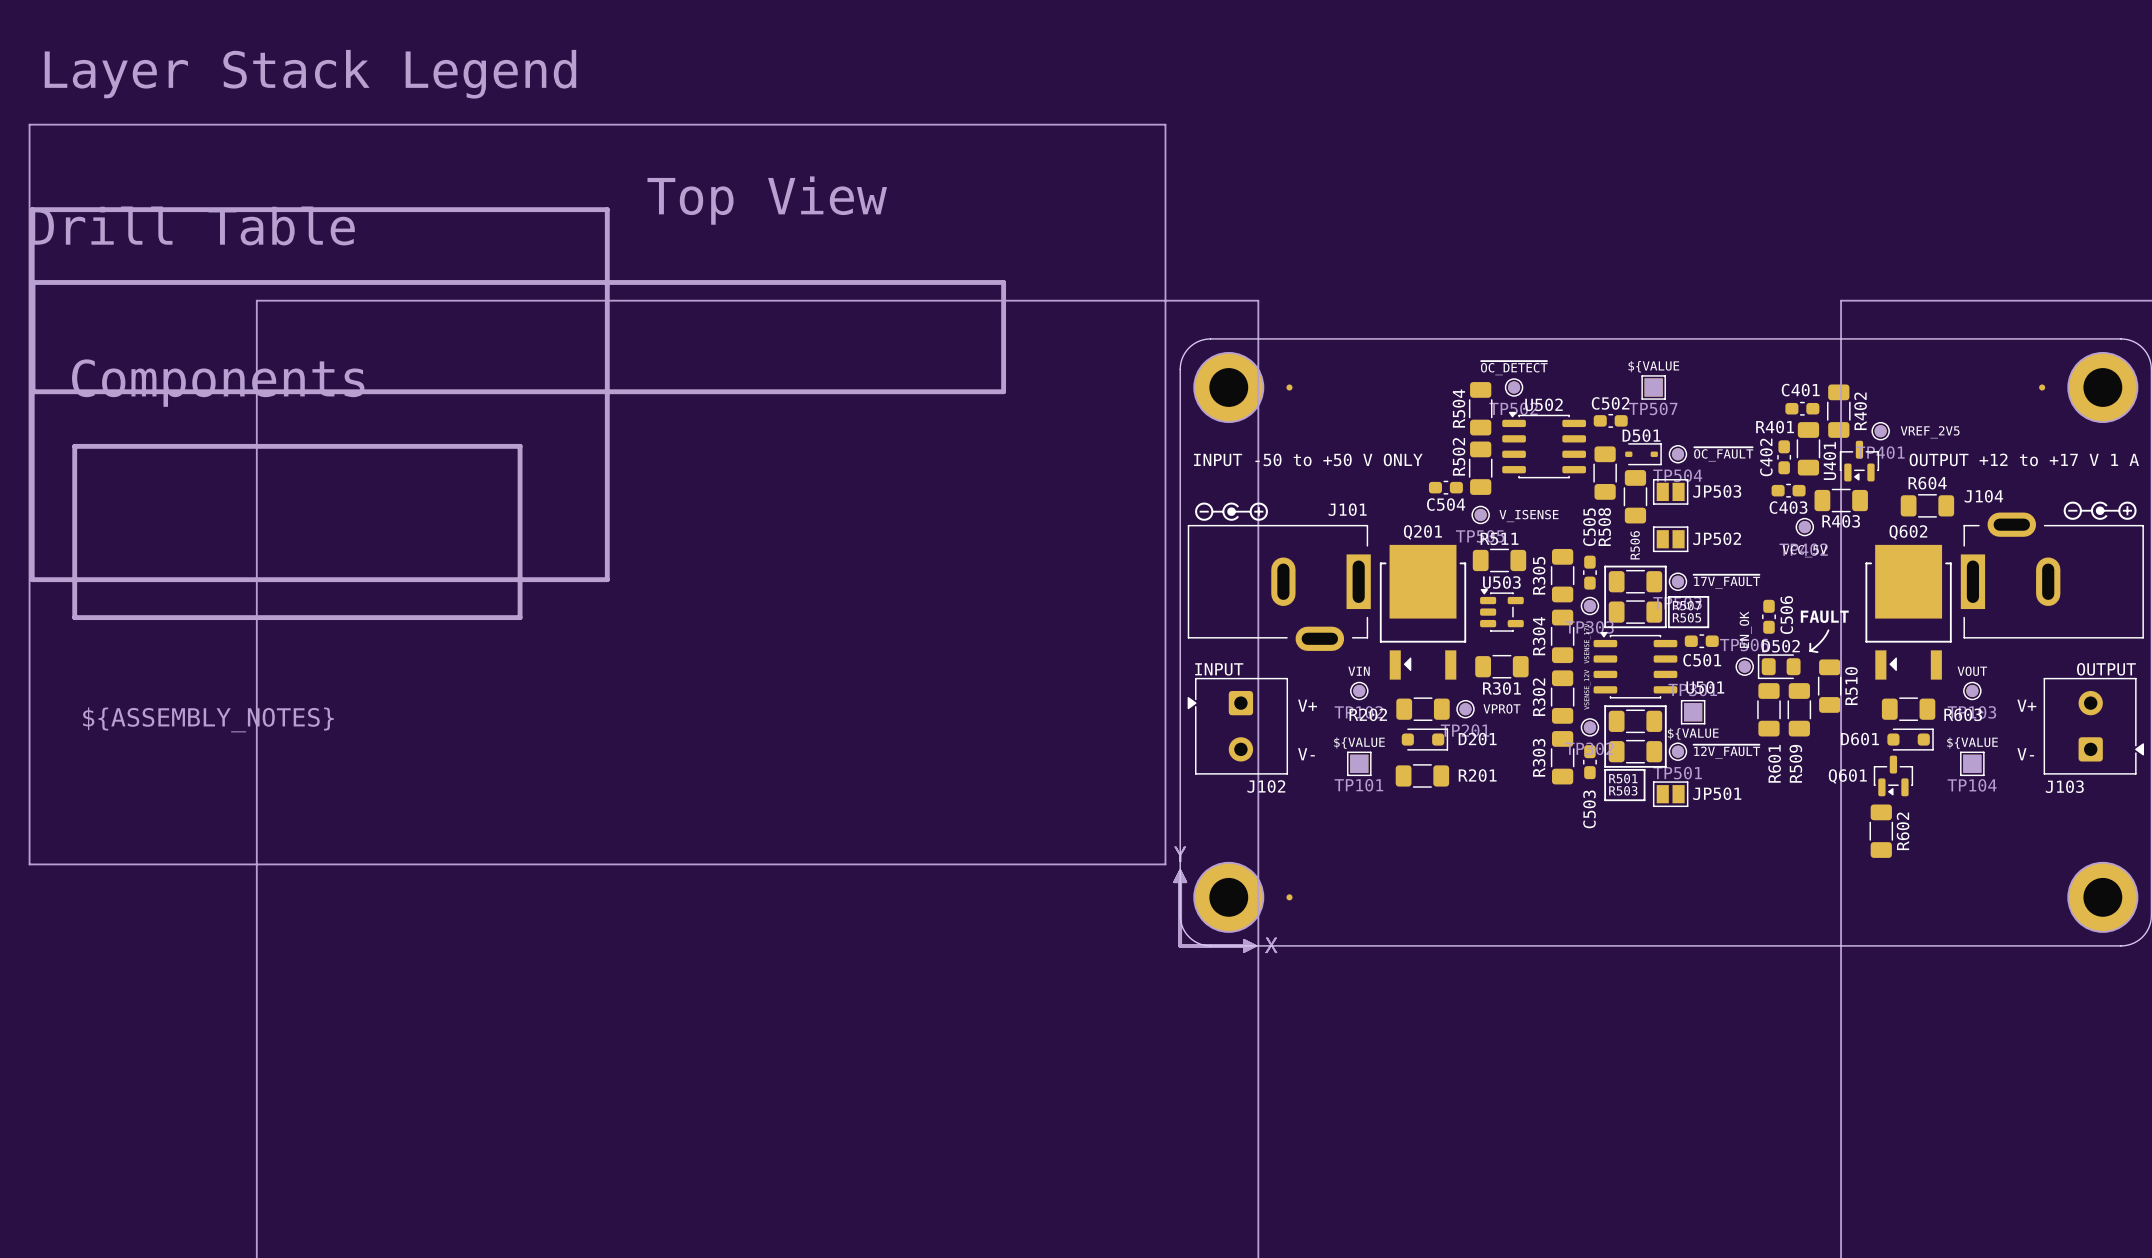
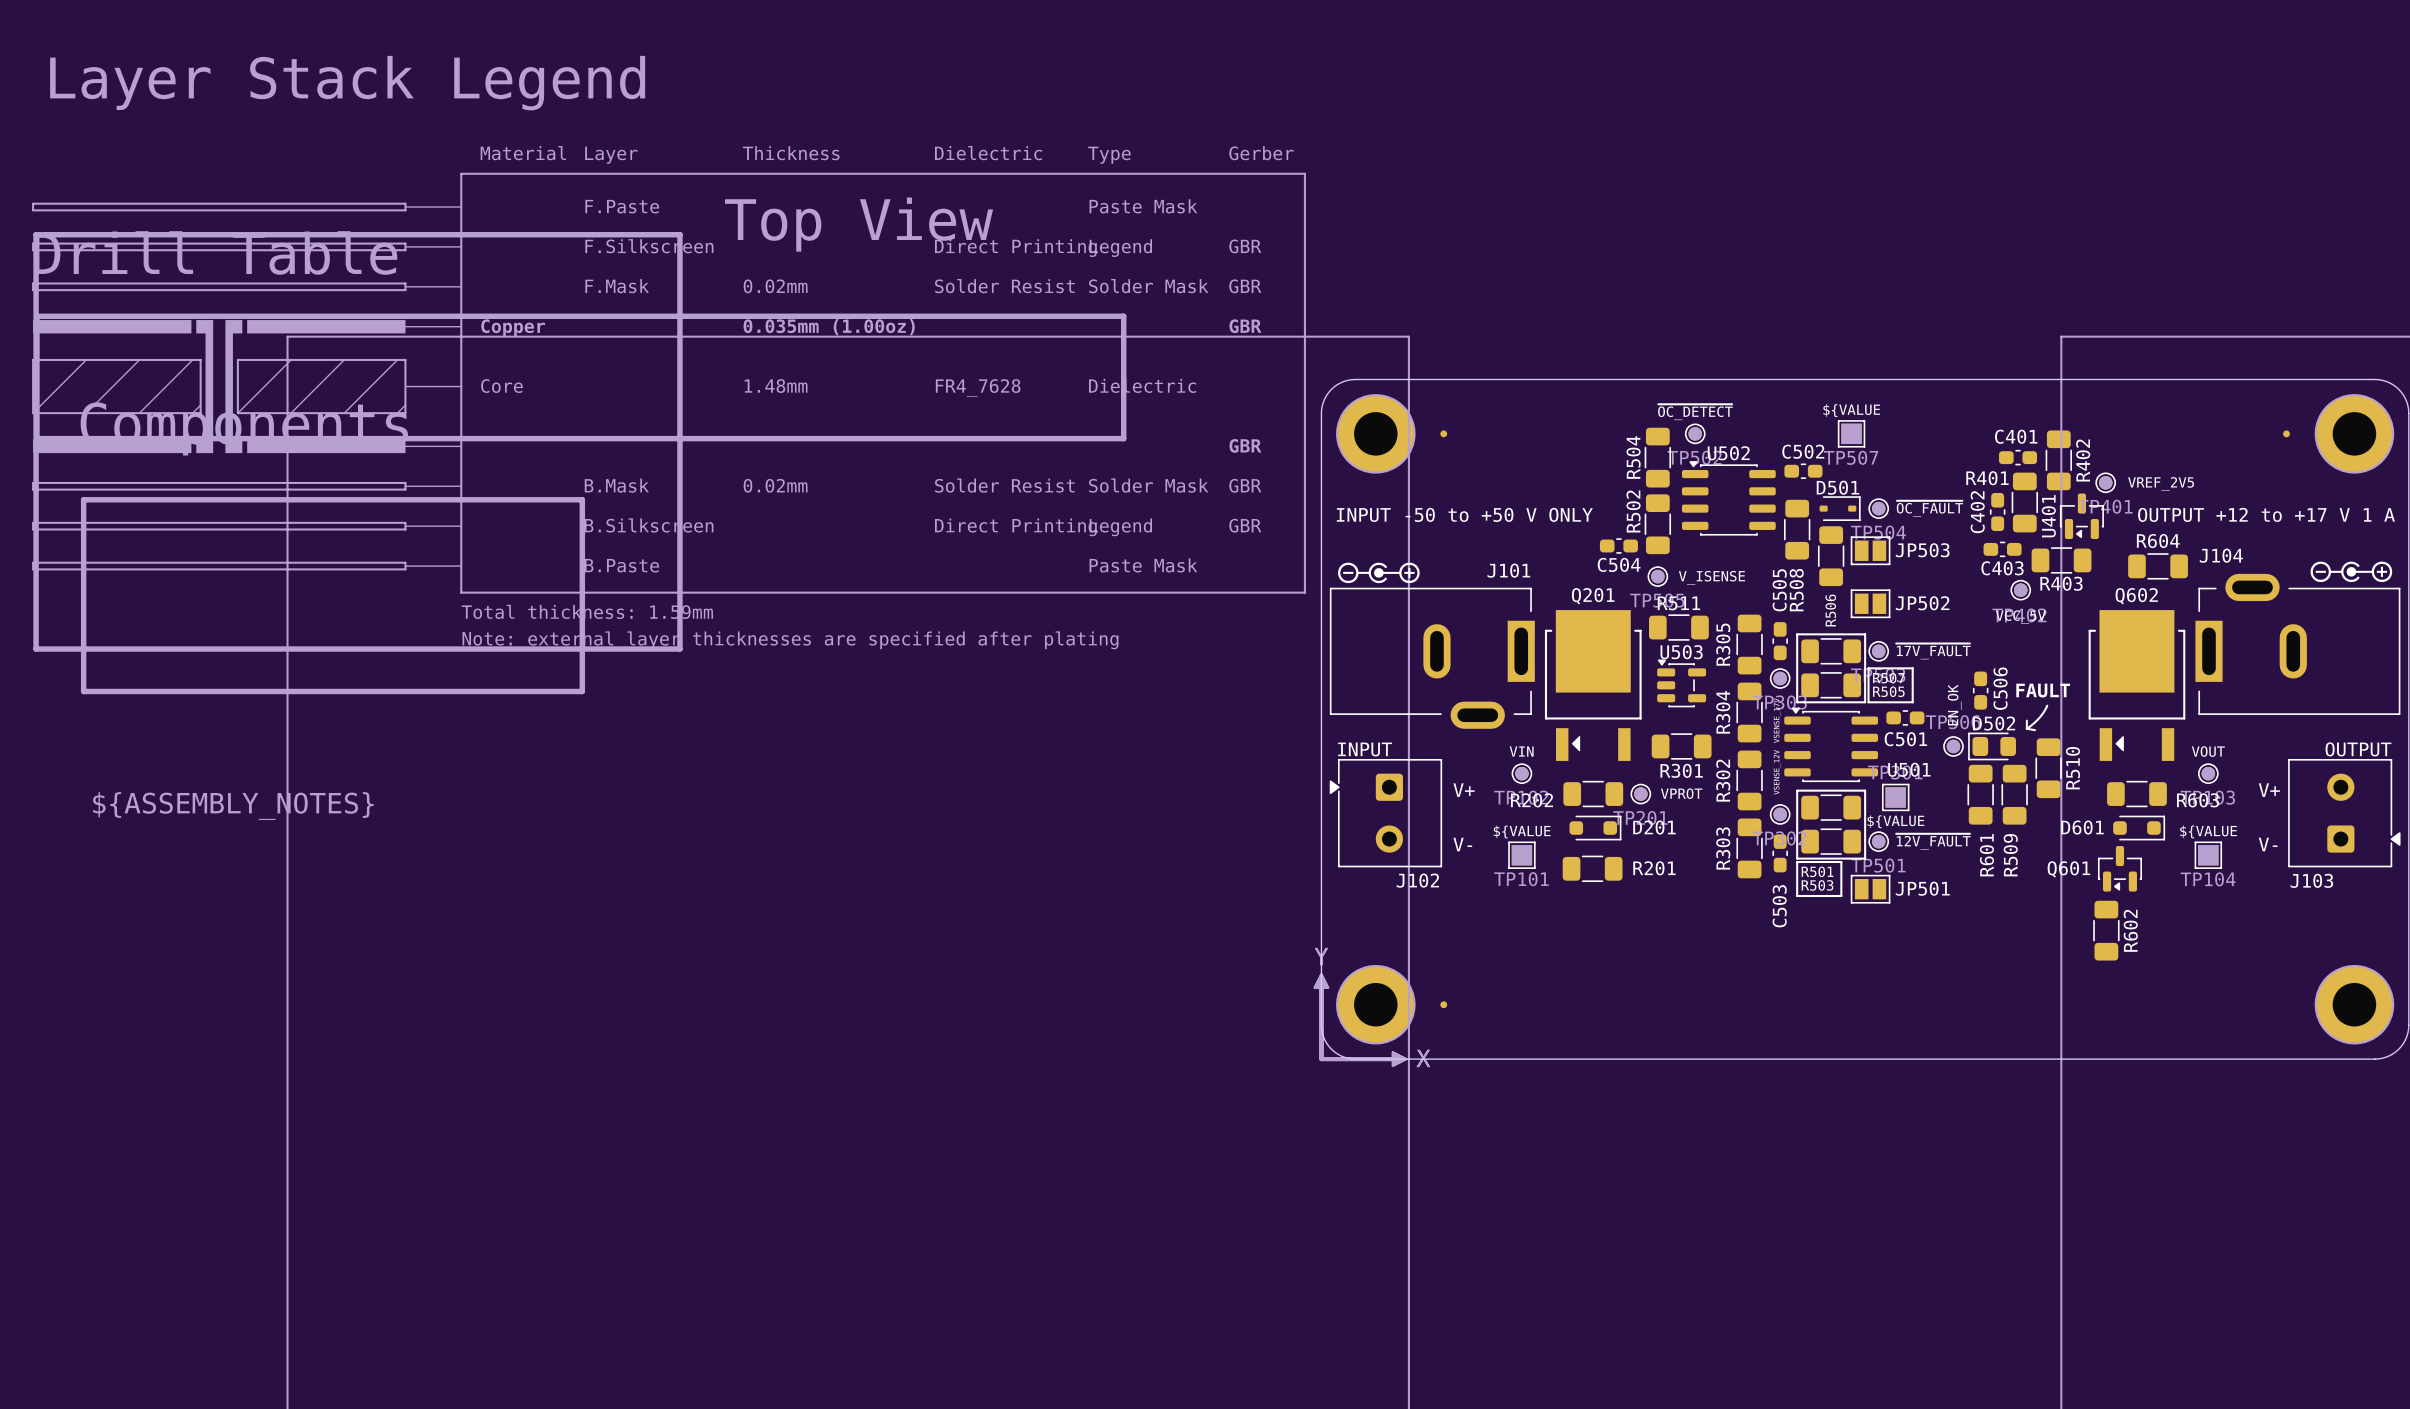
text: none -> Material (523, 153)
text: none -> Thickness (791, 153)
text: none -> Dielectric (988, 153)
text: none -> Gerber (1261, 153)
text: none -> Layer (611, 155)
text: none -> Type (1109, 155)
line: (1165, 155) (1165, 124) (29, 124) (29, 181) -> (33, 210) (405, 210) (405, 203) (33, 203)
line: none -> (405, 207) (461, 207)
text: none -> F.Paste (622, 206)
text: none -> Paste Mask (1143, 206)
line: (29, 187) (29, 217) -> (33, 250) (405, 250) (405, 243) (33, 243)
text: none -> F.Silkscreen (649, 246)
line: none -> (405, 246) (461, 246)
text: none -> GBR (1245, 246)
text: none -> Direct Printing (1015, 248)
text: none -> Legend (1120, 248)
line: (29, 223) (29, 253) -> (33, 290) (405, 290) (405, 283) (33, 283)
text: none -> F.Mask (617, 286)
text: none -> 0.02mm (775, 286)
text: none -> Solder Resist (1004, 286)
text: none -> Solder Mask (1148, 286)
text: none -> GBR (1245, 286)
line: none -> (405, 286) (461, 286)
line: (29, 259) (29, 321) -> (86, 359) (33, 413) (200, 413) (200, 359) (33, 359)
drawing: none -> [33, 319, 406, 454]
line: none -> (405, 326) (461, 326)
text: none -> GBR (1245, 326)
text: none -> Copper (513, 327)
text: none -> 0.035mm (1.00oz) (829, 327)
line: none -> (139, 359) (86, 413)
line: none -> (192, 359) (139, 413)
line: none -> (291, 359) (237, 413)
line: none -> (344, 359) (291, 413)
line: none -> (397, 359) (344, 413)
text: none -> Core (501, 386)
text: none -> 1.48mm (776, 386)
text: none -> Dielectric (1142, 385)
line: none -> (405, 386) (461, 386)
text: none -> FR4_7628 (978, 388)
line: none -> (200, 405) (192, 413)
line: none -> (405, 405) (397, 413)
line: (29, 368) (29, 431) -> (33, 489) (405, 489) (405, 482) (33, 482)
line: none -> (237, 413) (405, 413) (405, 359) (237, 359) (237, 413)
line: none -> (405, 446) (461, 446)
text: none -> GBR (1245, 445)
text: none -> B.Mask (616, 485)
text: none -> 0.02mm (775, 485)
text: none -> Solder Resist (1004, 485)
text: none -> Solder Mask (1148, 485)
text: none -> GBR (1245, 485)
line: none -> (405, 486) (461, 486)
line: (29, 437) (29, 466) -> (33, 529) (405, 529) (405, 522) (33, 522)
line: none -> (405, 526) (461, 526)
text: none -> B.Silkscreen (649, 525)
text: none -> GBR (1245, 525)
text: none -> Direct Printing (1015, 527)
text: none -> Legend (1120, 527)
line: (29, 472) (29, 502) -> (33, 569) (405, 569) (405, 562) (33, 562)
text: none -> Paste Mask (1143, 565)
line: none -> (405, 566) (461, 566)
text: none -> B.Paste (621, 565)
line: (29, 508) (29, 864) (1165, 864) (1165, 529) -> (1304, 173) (461, 173) (461, 592) (1304, 592)
text: none -> Total thickness: 1.59mm (587, 611)
text: none -> Note: external layer thicknesses are specified after plating (790, 640)

